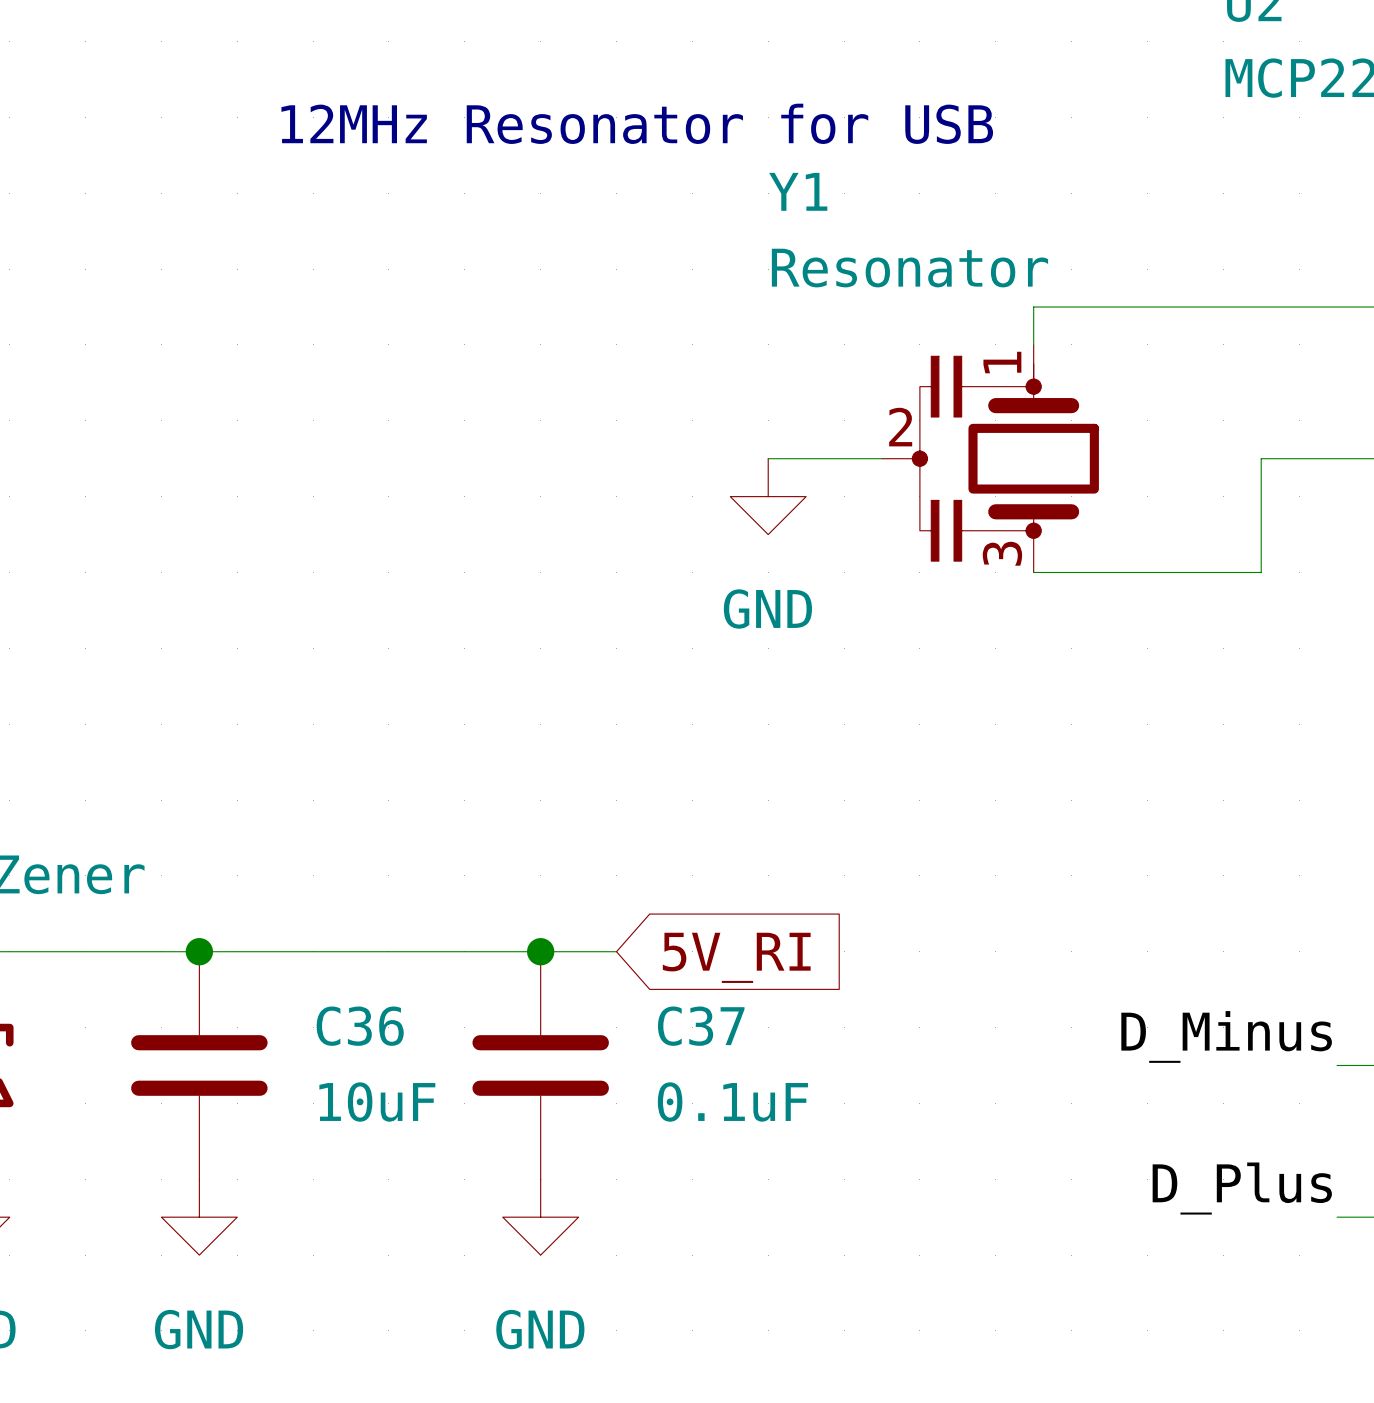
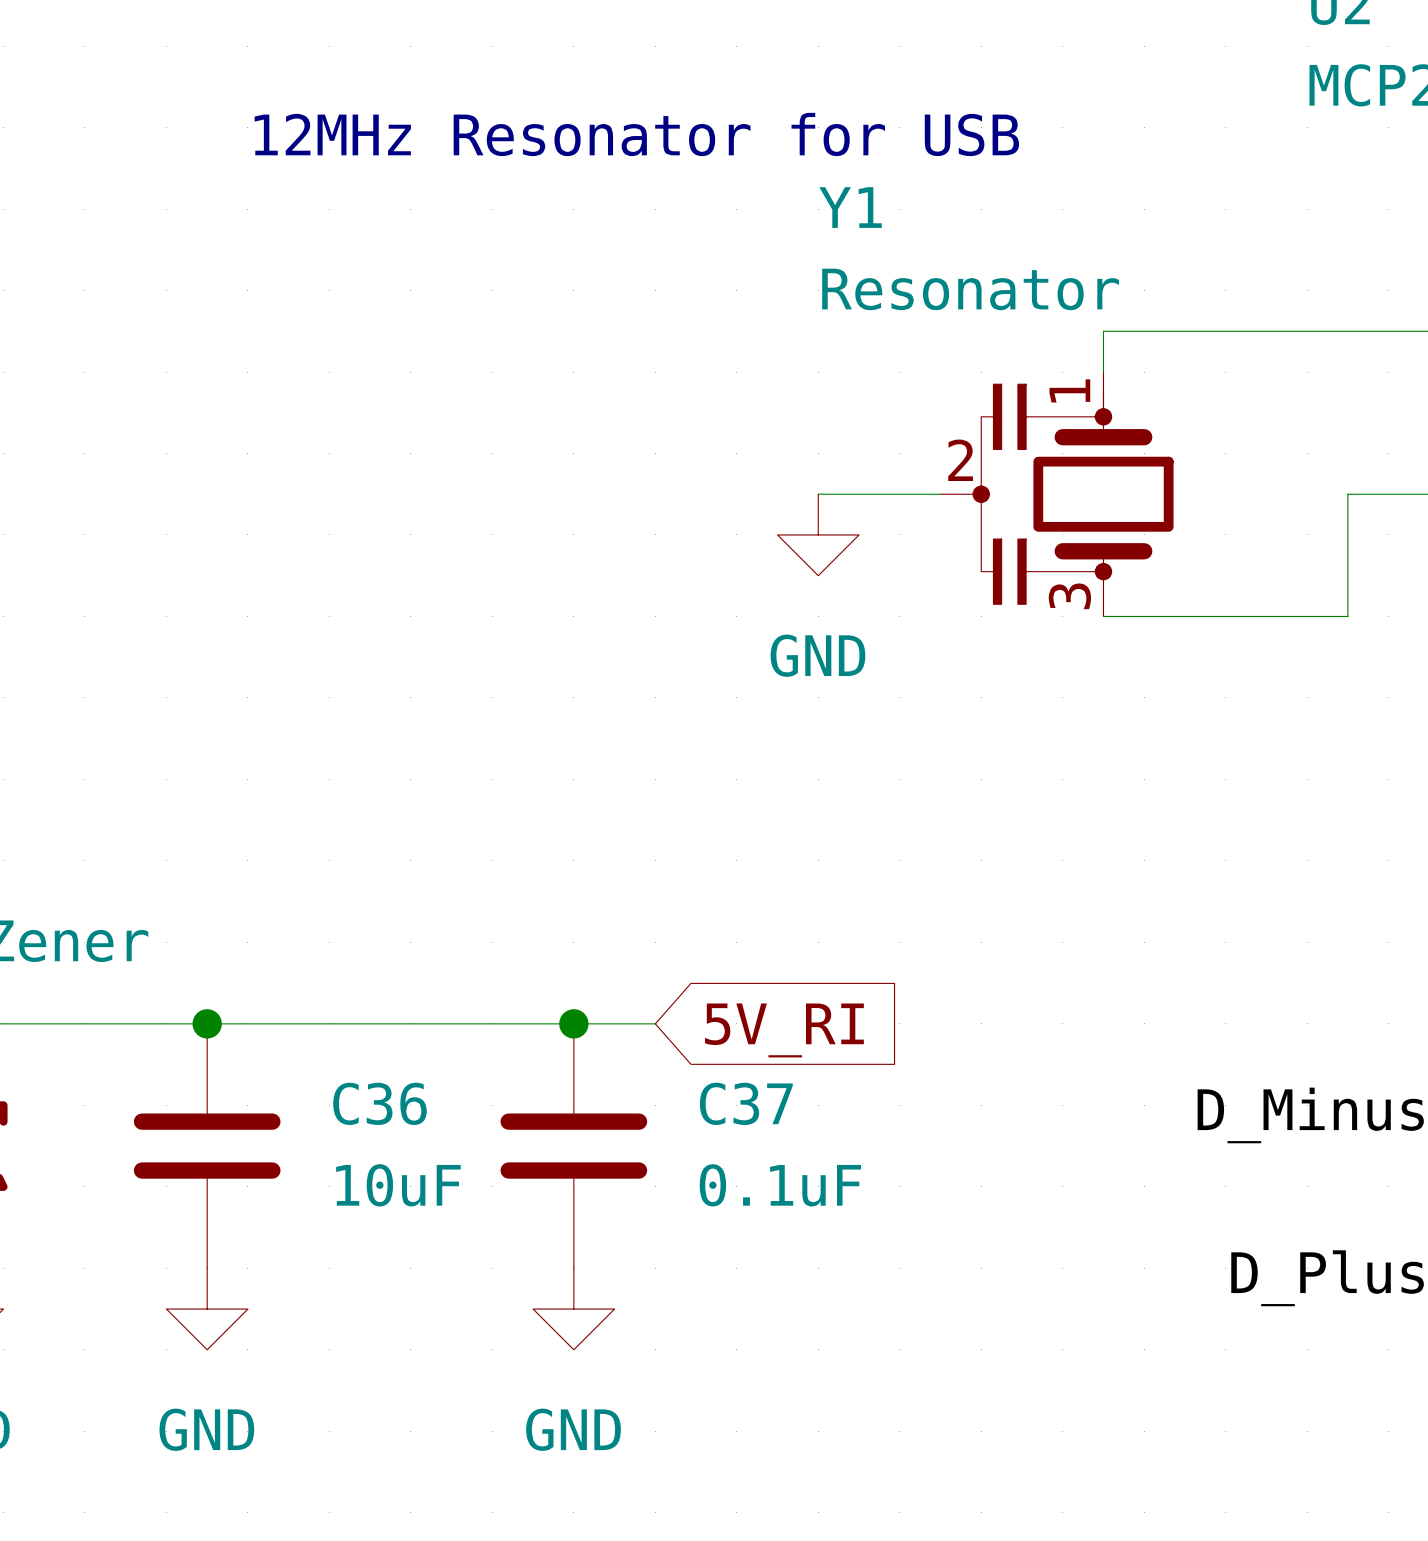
text position: 12MHz Resonator for USB (637, 123) -> 12MHz Resonator for USB (636, 134)

